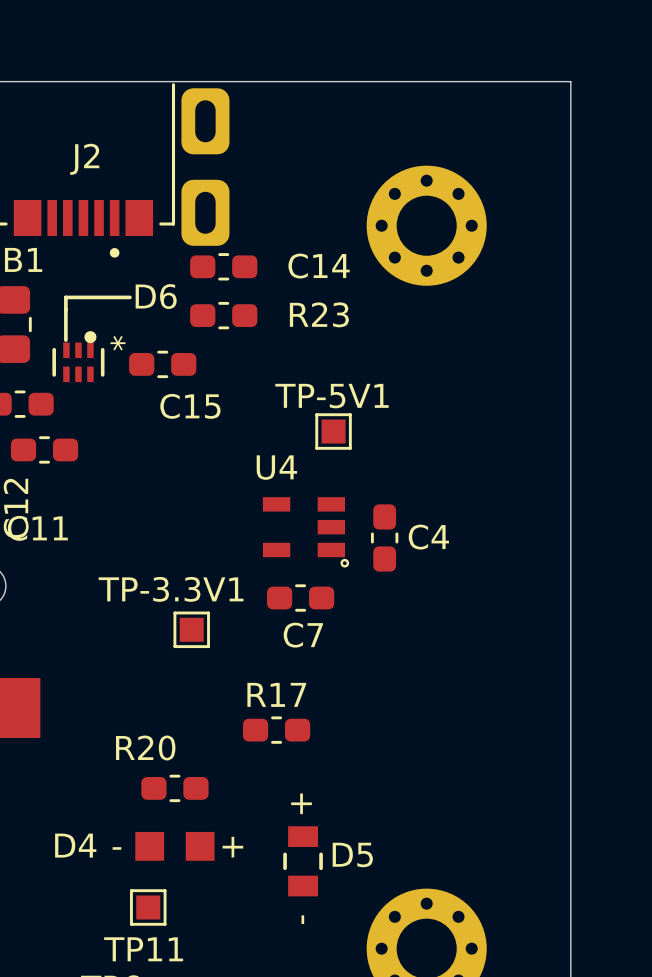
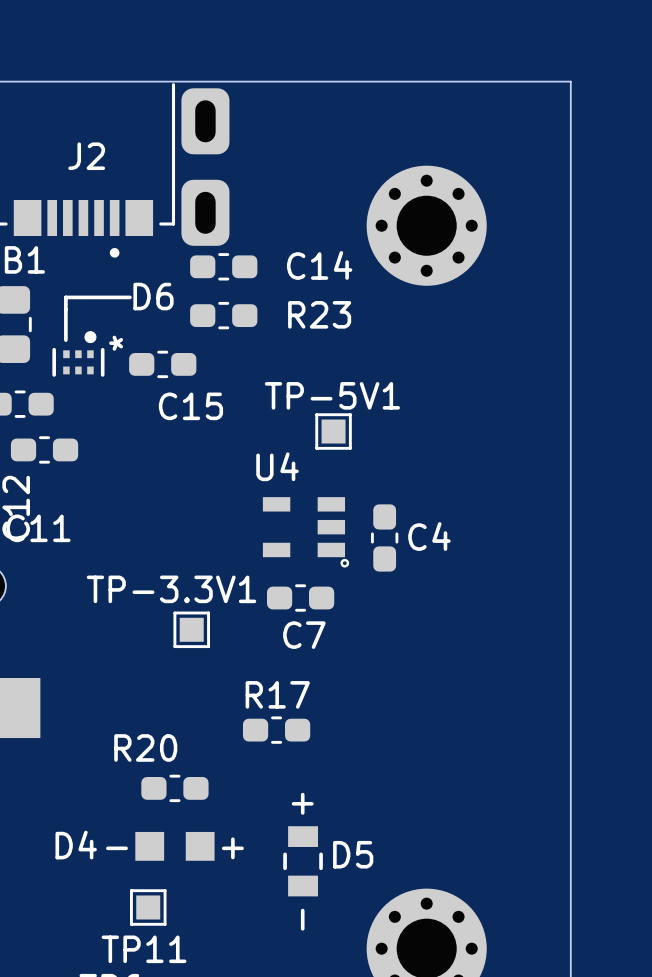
D6 footprint: [52, 331, 105, 383] -> [52, 331, 105, 377]

